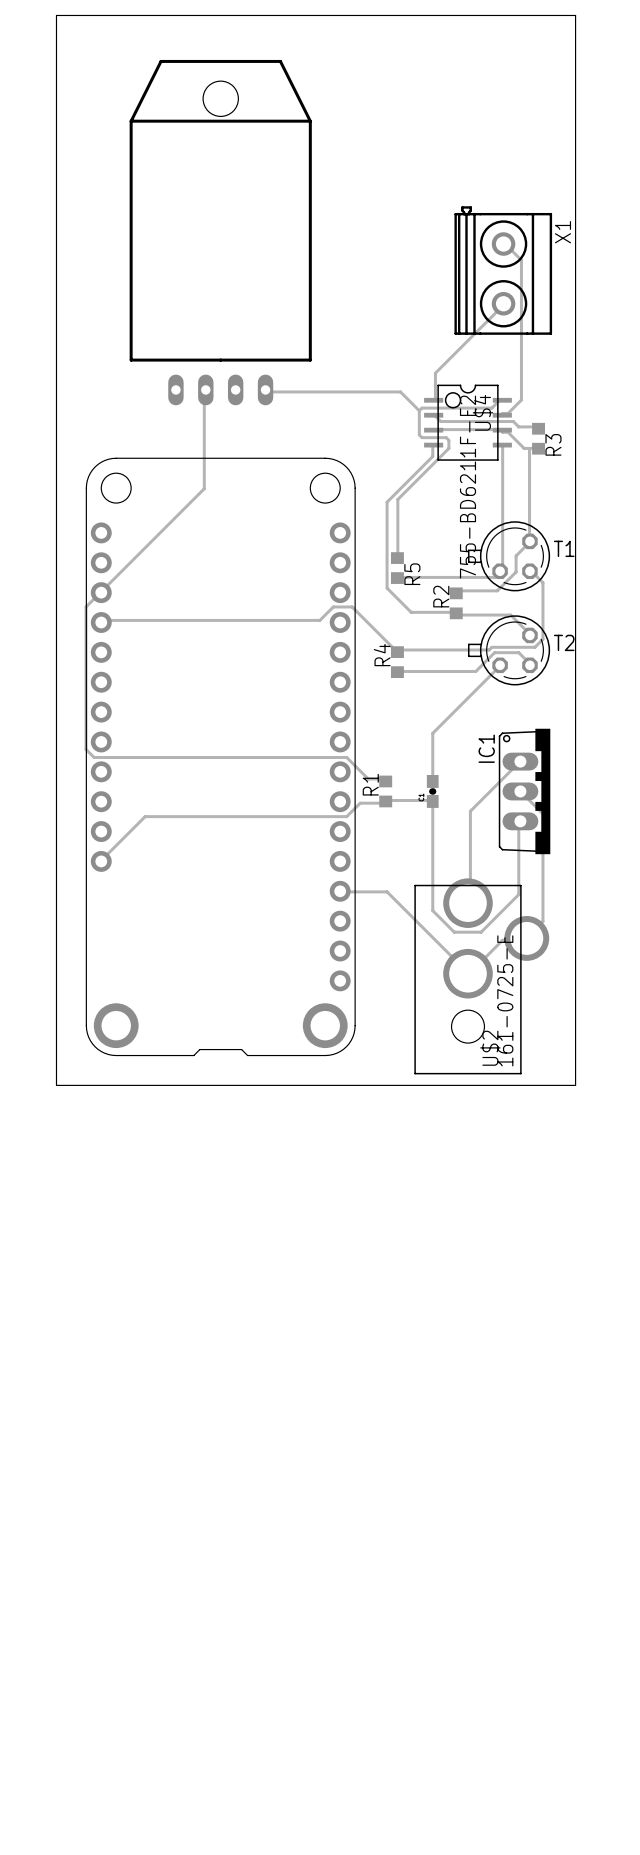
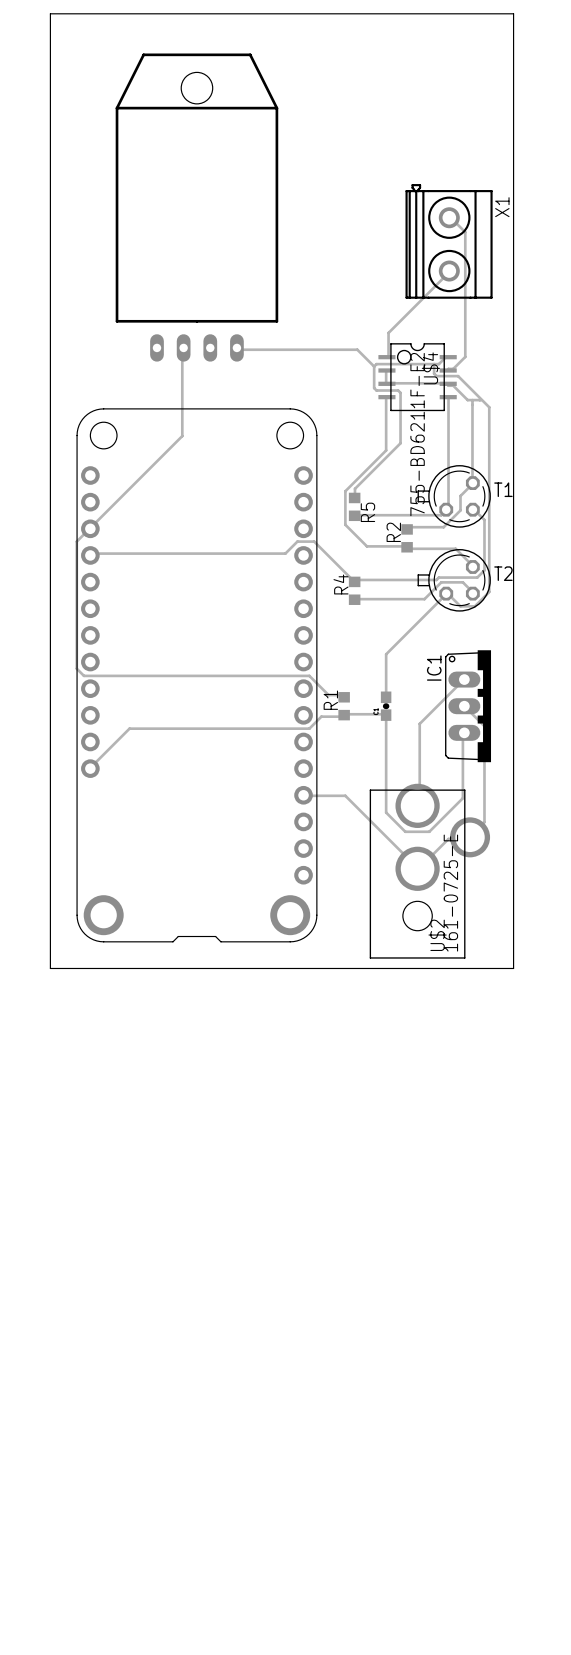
track: (433, 415) (440, 421) (489, 421) -> (434, 364) (434, 373) (436, 376)
track: none -> (386, 370) (386, 383)
track: (518, 426) (537, 426) (538, 428) -> (462, 380) (489, 407) (489, 591) (474, 606) (460, 606) (446, 593)
R3: (538, 438) -> none
track: (448, 448) (397, 499) (397, 547) -> (400, 400) (400, 443) (354, 488)
track: (432, 456) (387, 502) (387, 550) -> (386, 407) (386, 450) (345, 491)

